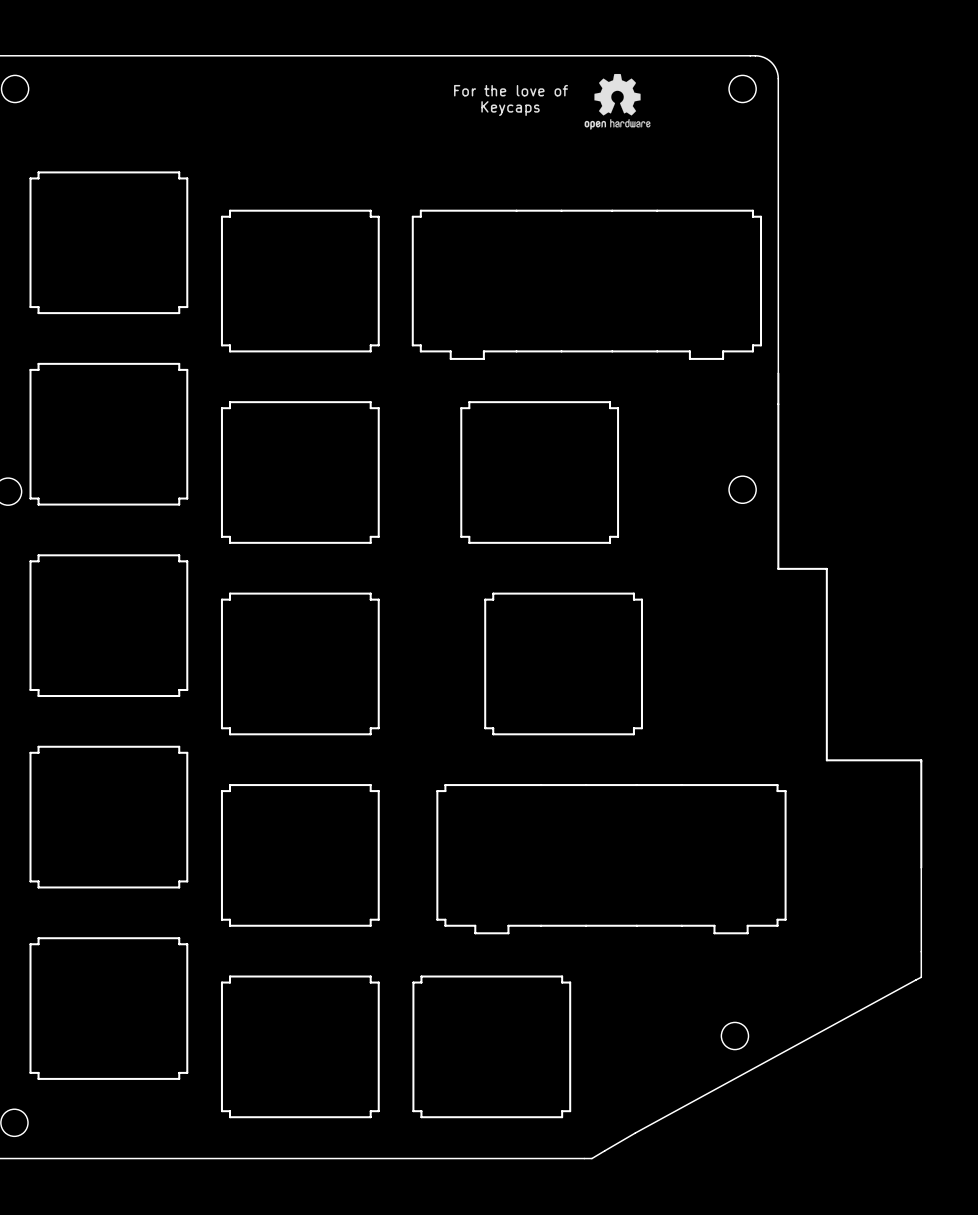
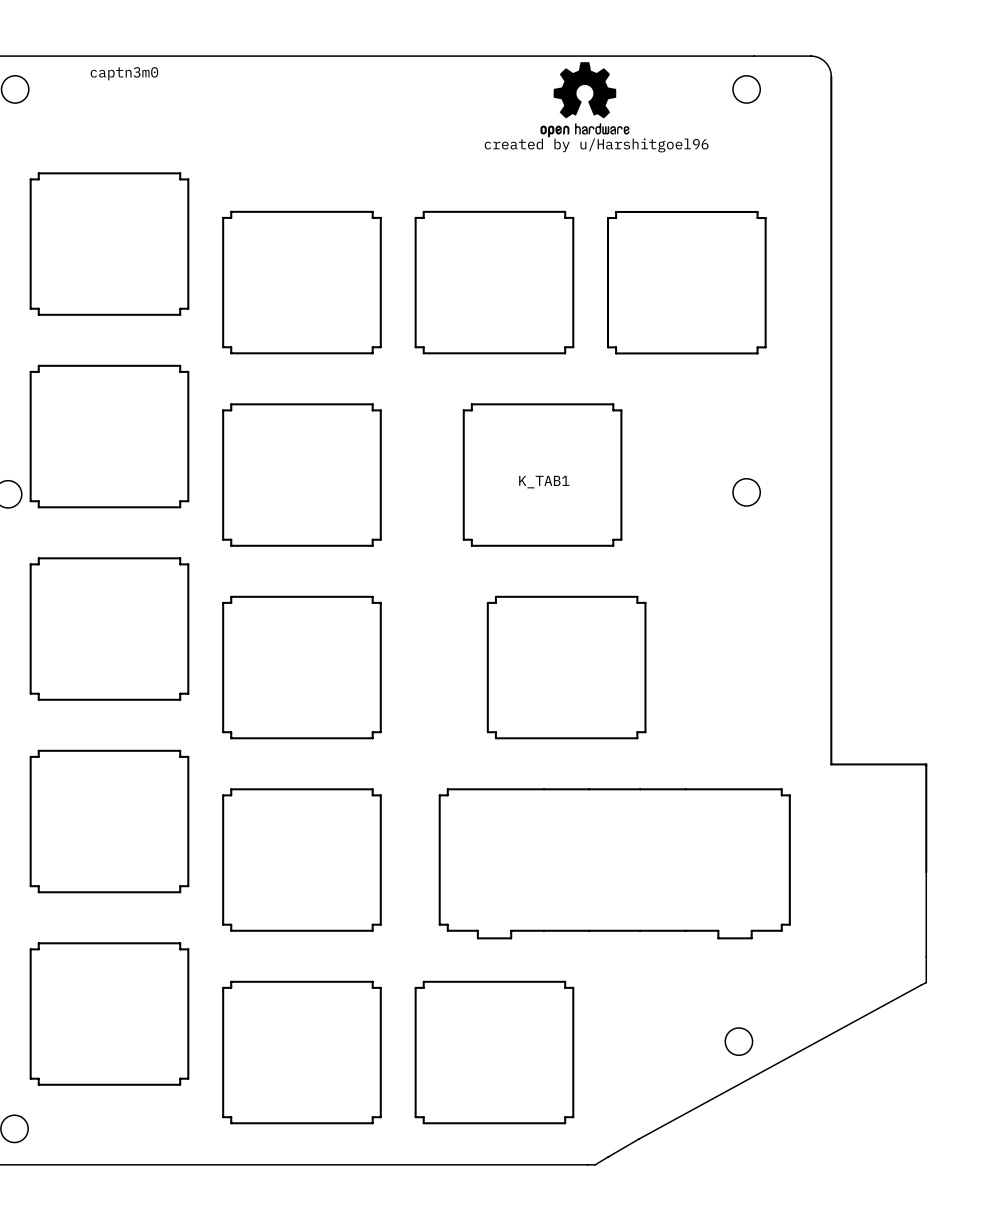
board edge: (755, 55) (764, 57) (771, 62) (776, 69) (778, 78) (778, 568) (826, 568) -> (759, 56) (815, 56) (825, 62) (831, 74) (831, 571)
drawing: none -> [540, 62, 630, 138]
text: none -> captn3m0 (124, 73)
drawing: [584, 73, 651, 130] -> none
text: For the love of (511, 90) -> none
text: Keycaps (510, 108) -> none
text: none -> created by u/Harshitgoel96 (596, 145)
drawing: [411, 209, 763, 360] -> none
drawing: none -> [414, 210, 575, 355]
drawing: none -> [607, 210, 767, 355]
K_TAB1: none -> (542, 475)

